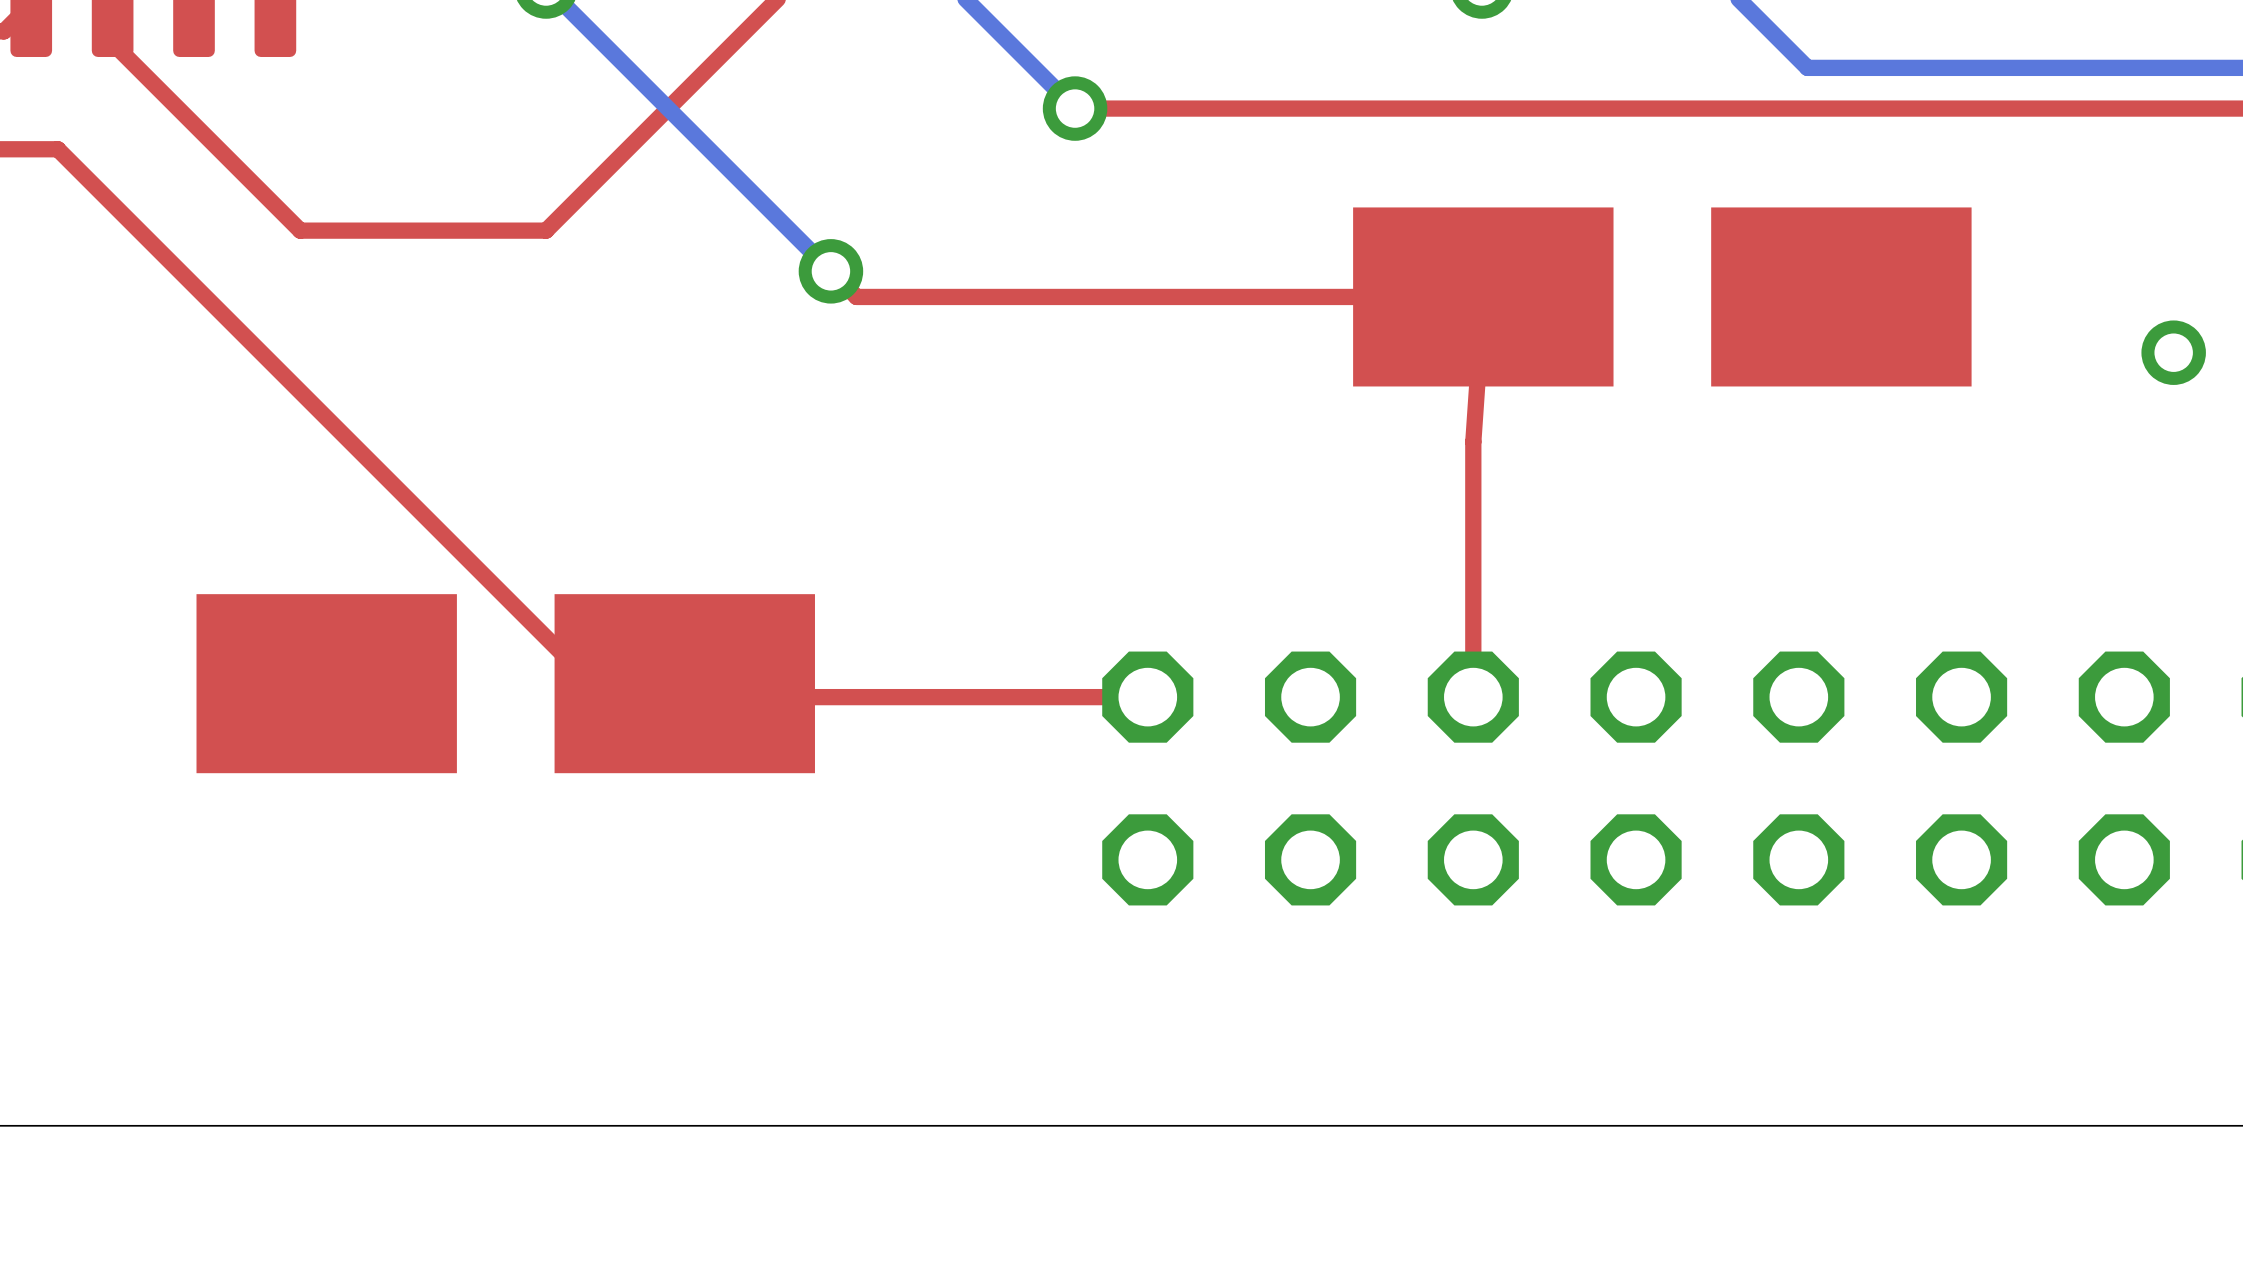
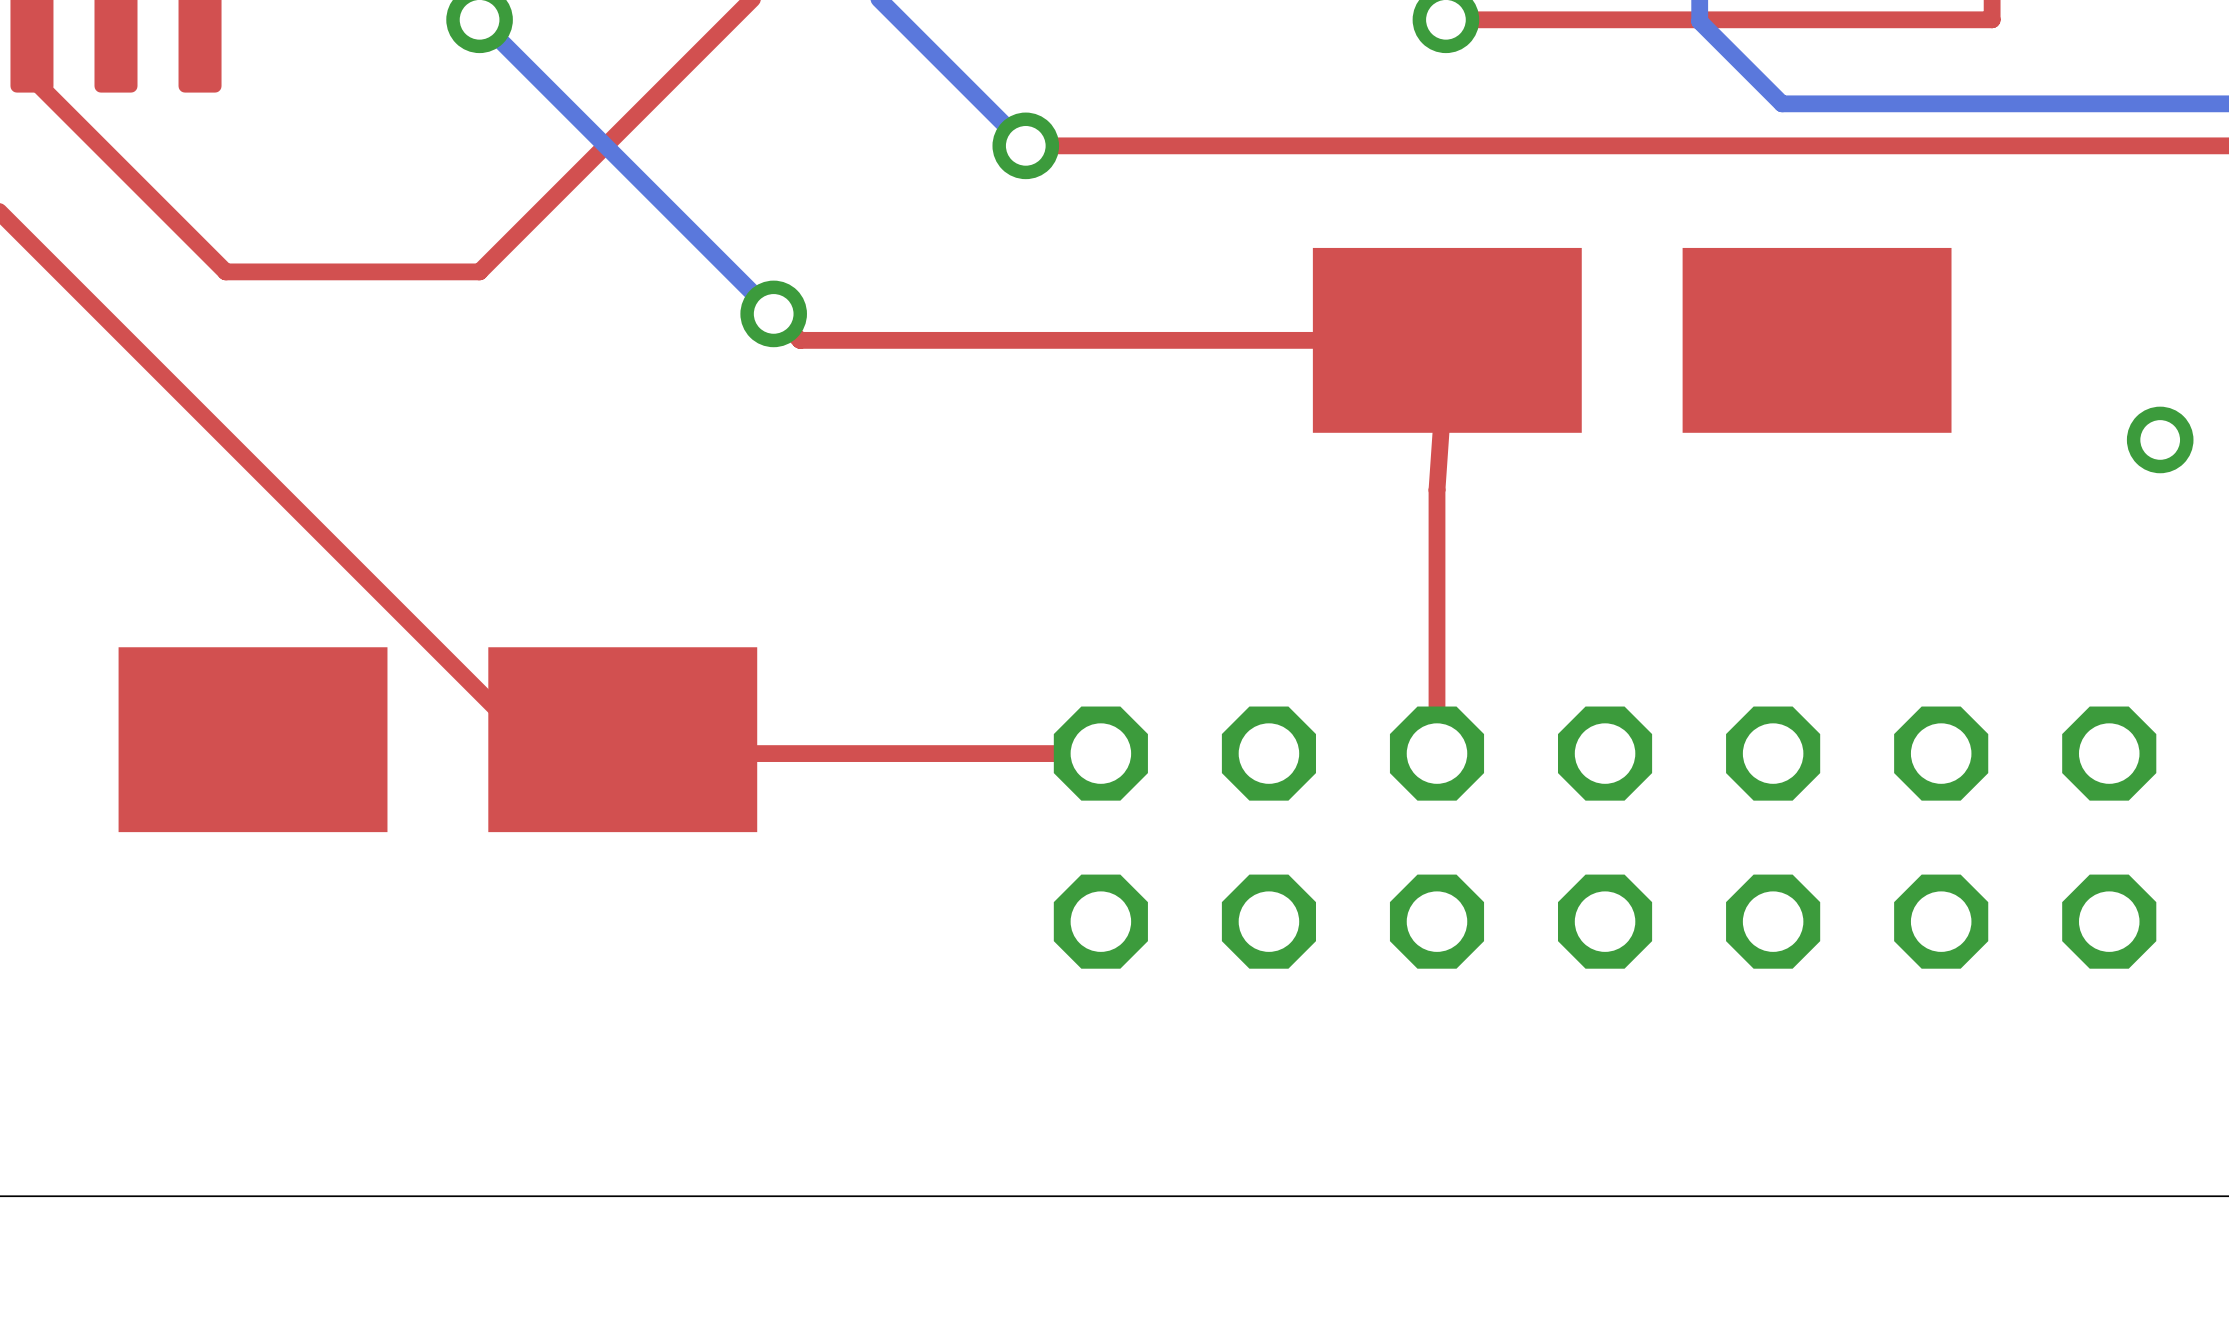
via position: (2173, 352) -> (2160, 439)

